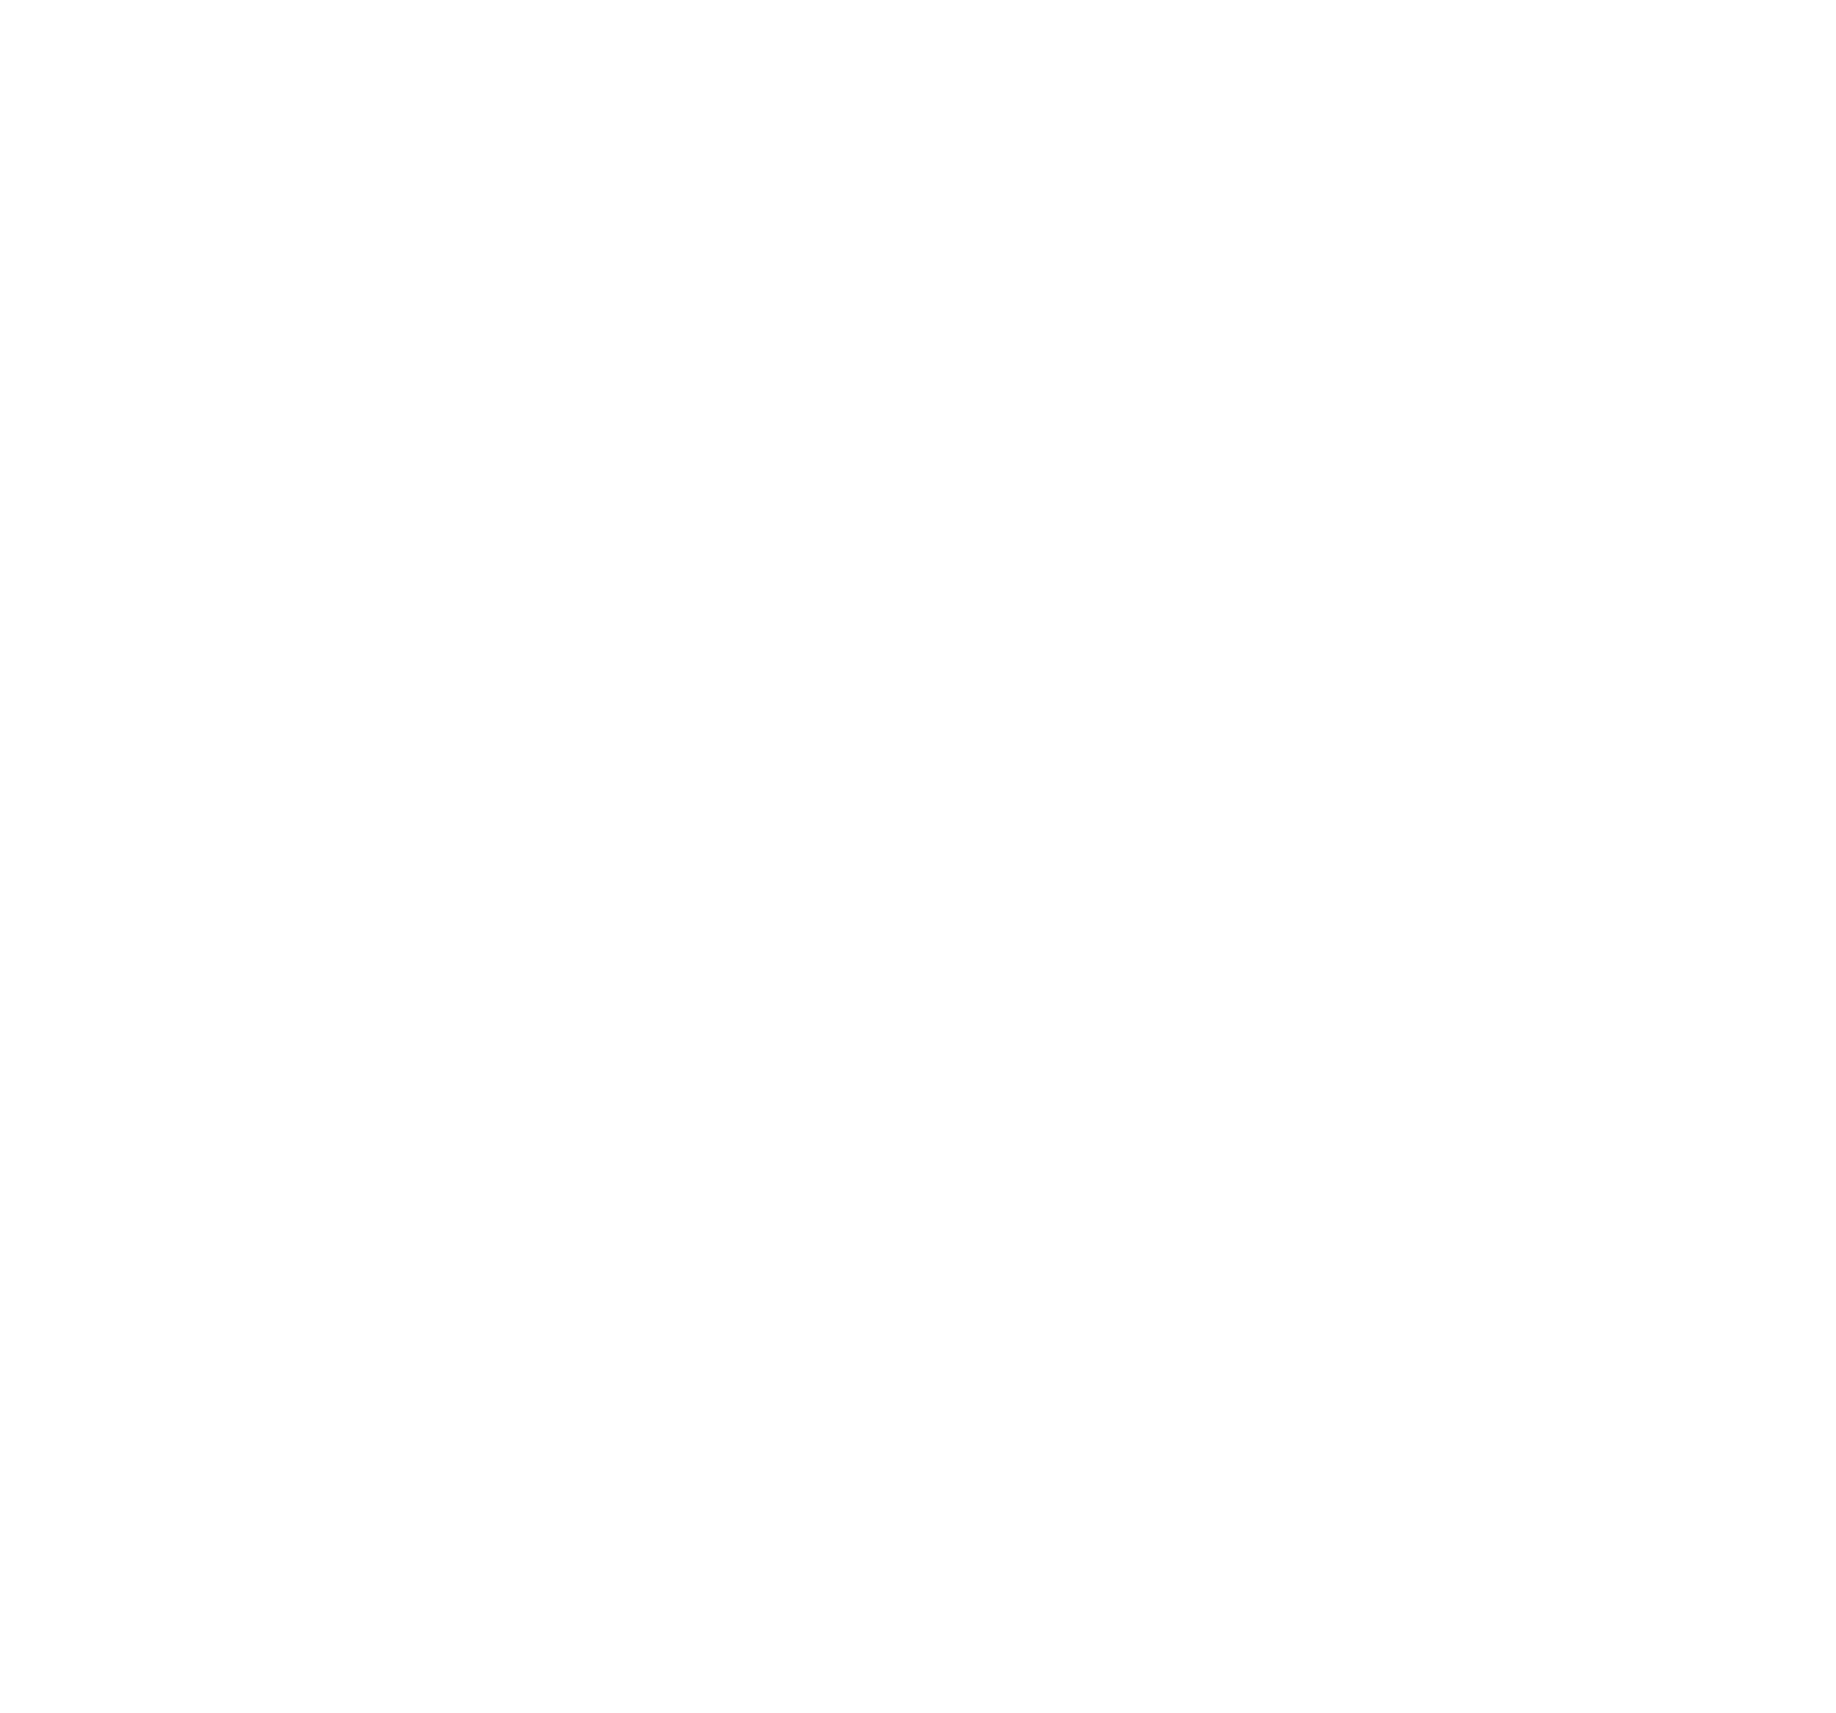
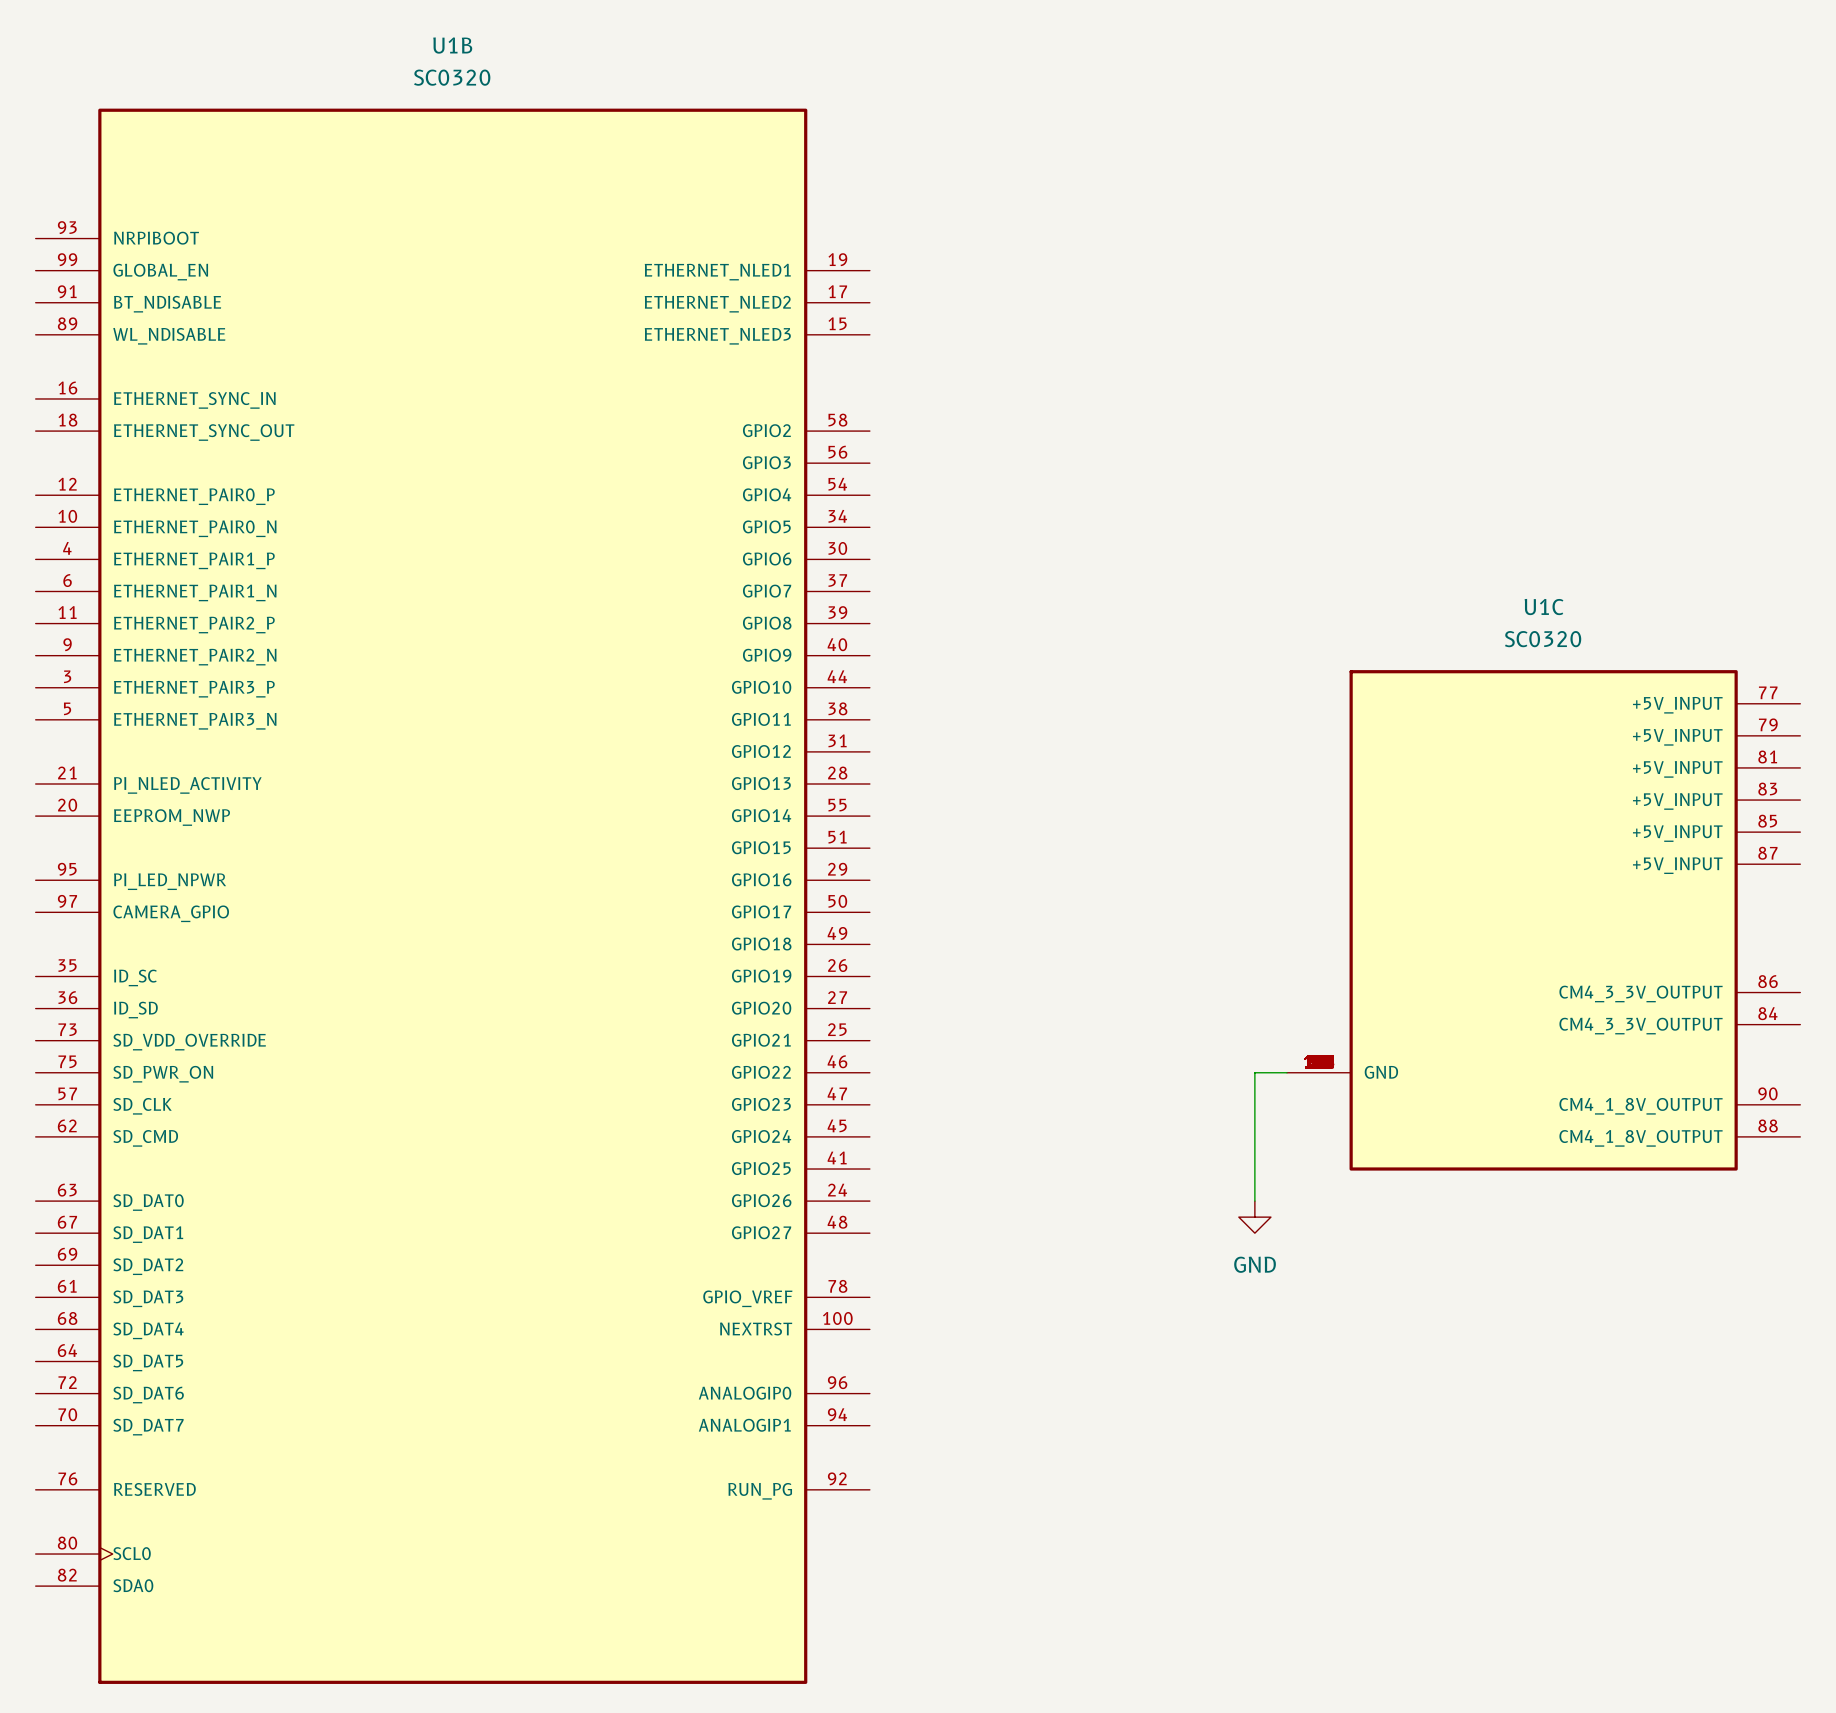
U1B: none -> SC0320 (452, 896)
U1C: none -> SC0320 (1543, 920)
wire: none -> (1286, 1072) (1254, 1072) (1254, 1201)
power symbol: none -> GND (1254, 1217)

